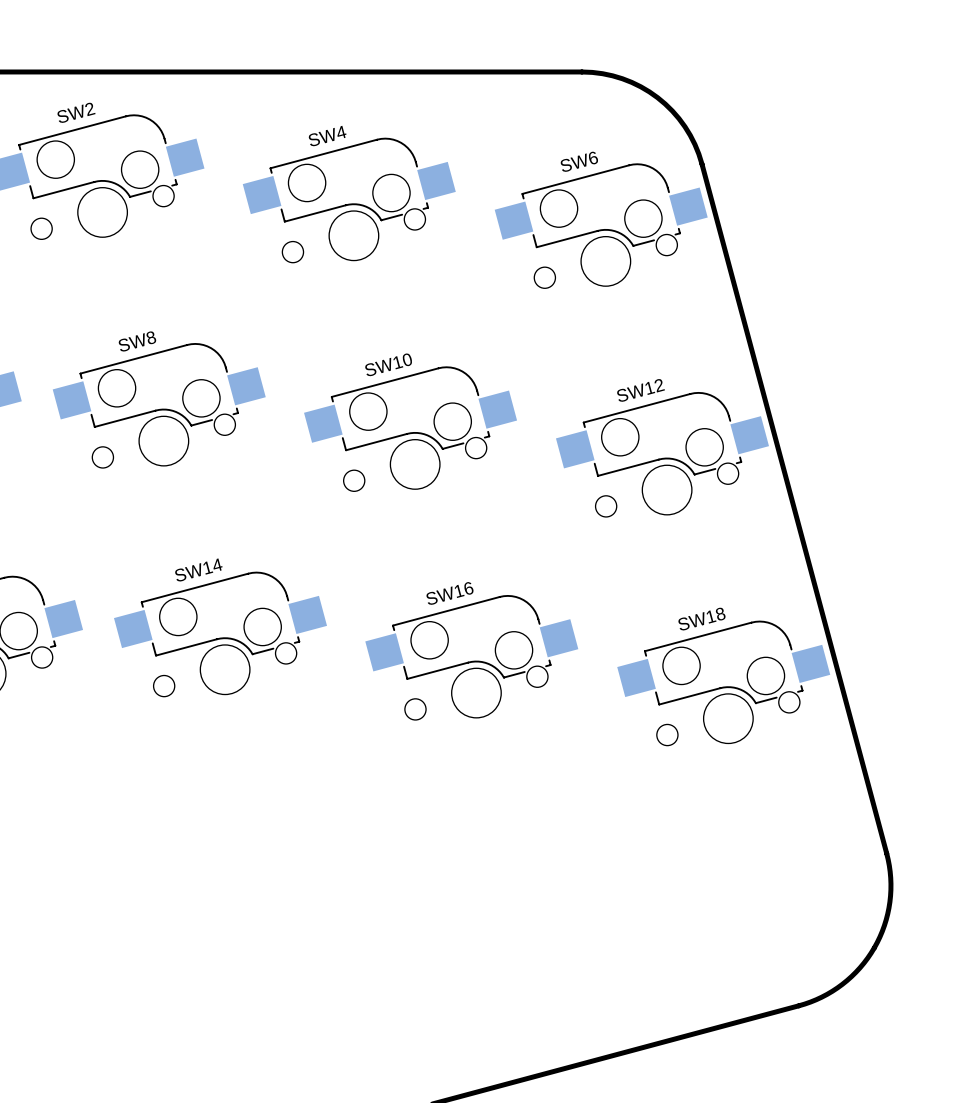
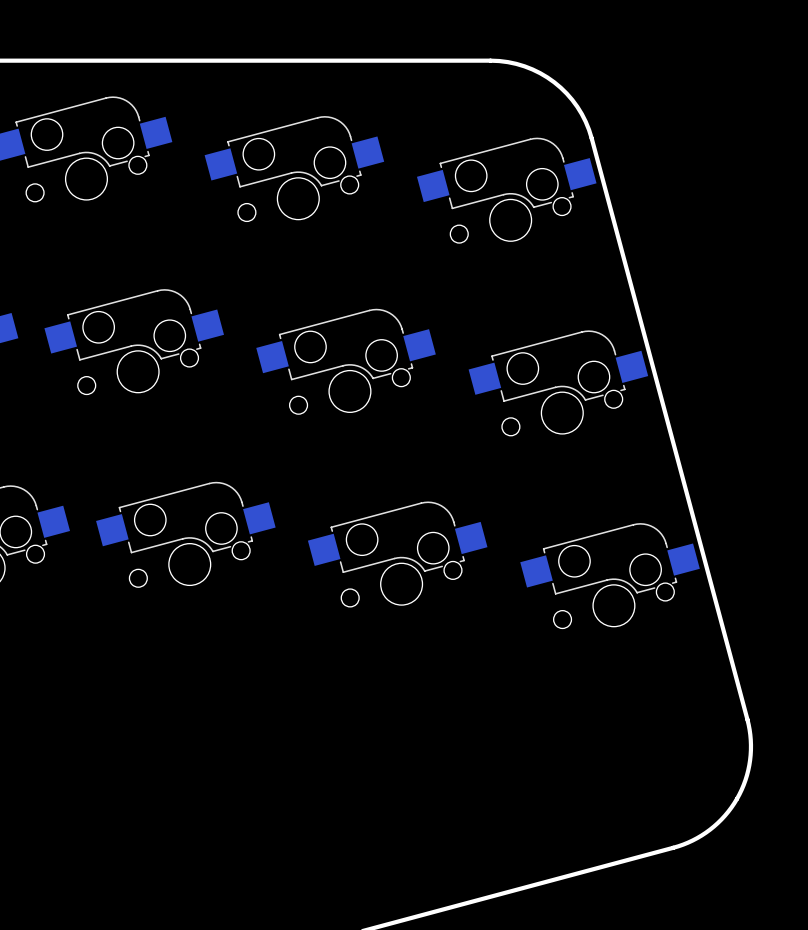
SW2 name: SW2 (76, 113) -> none
SW4 name: SW4 (327, 136) -> none
SW6 name: SW6 (579, 161) -> none
SW8 name: SW8 (137, 341) -> none
SW10 name: SW10 (388, 365) -> none
SW12 name: SW12 (640, 390) -> none
SW14 name: SW14 (198, 570) -> none
SW16 name: SW16 (450, 593) -> none
SW18 name: SW18 (701, 619) -> none

